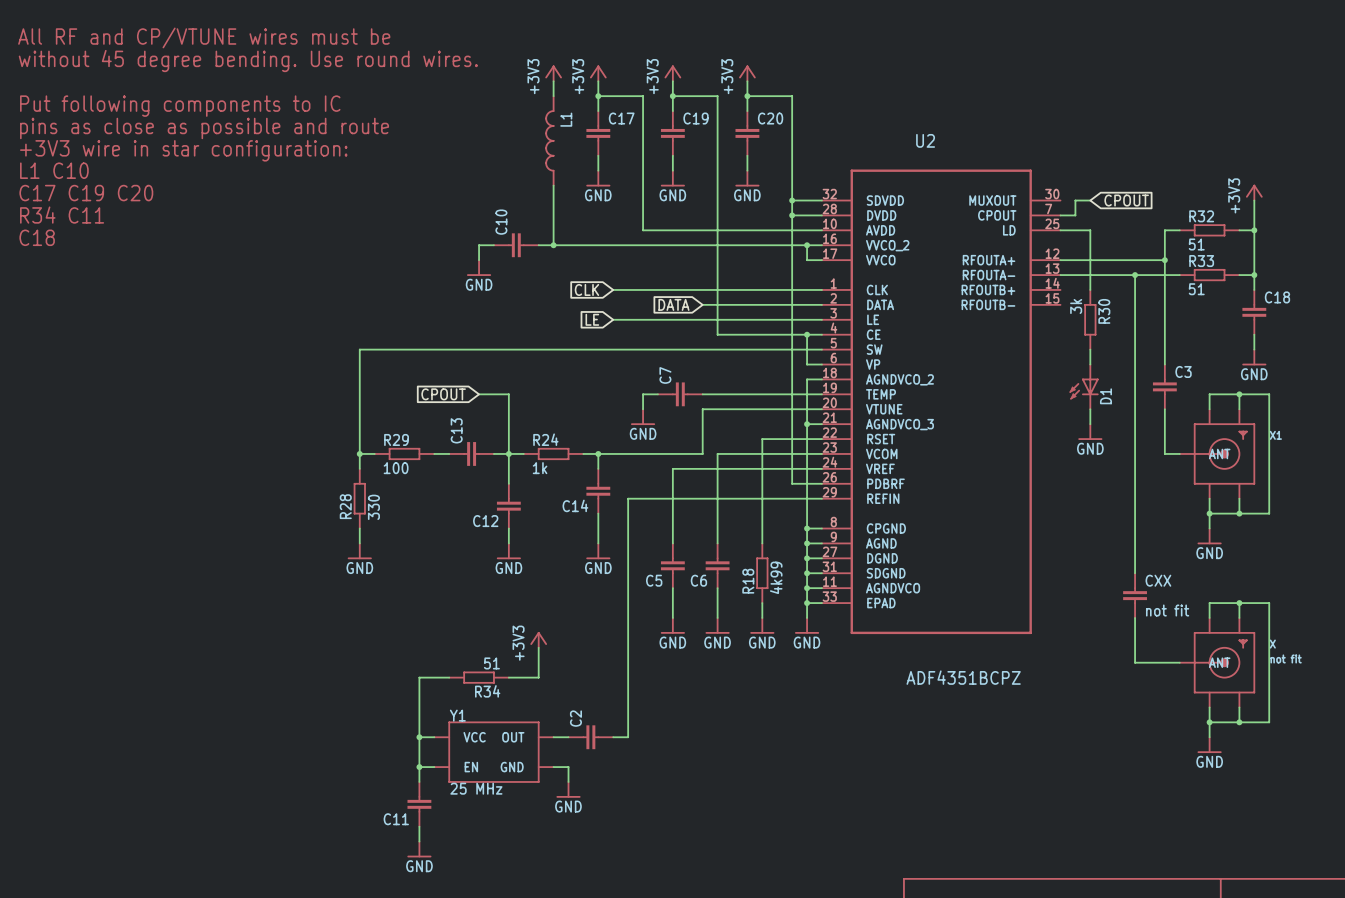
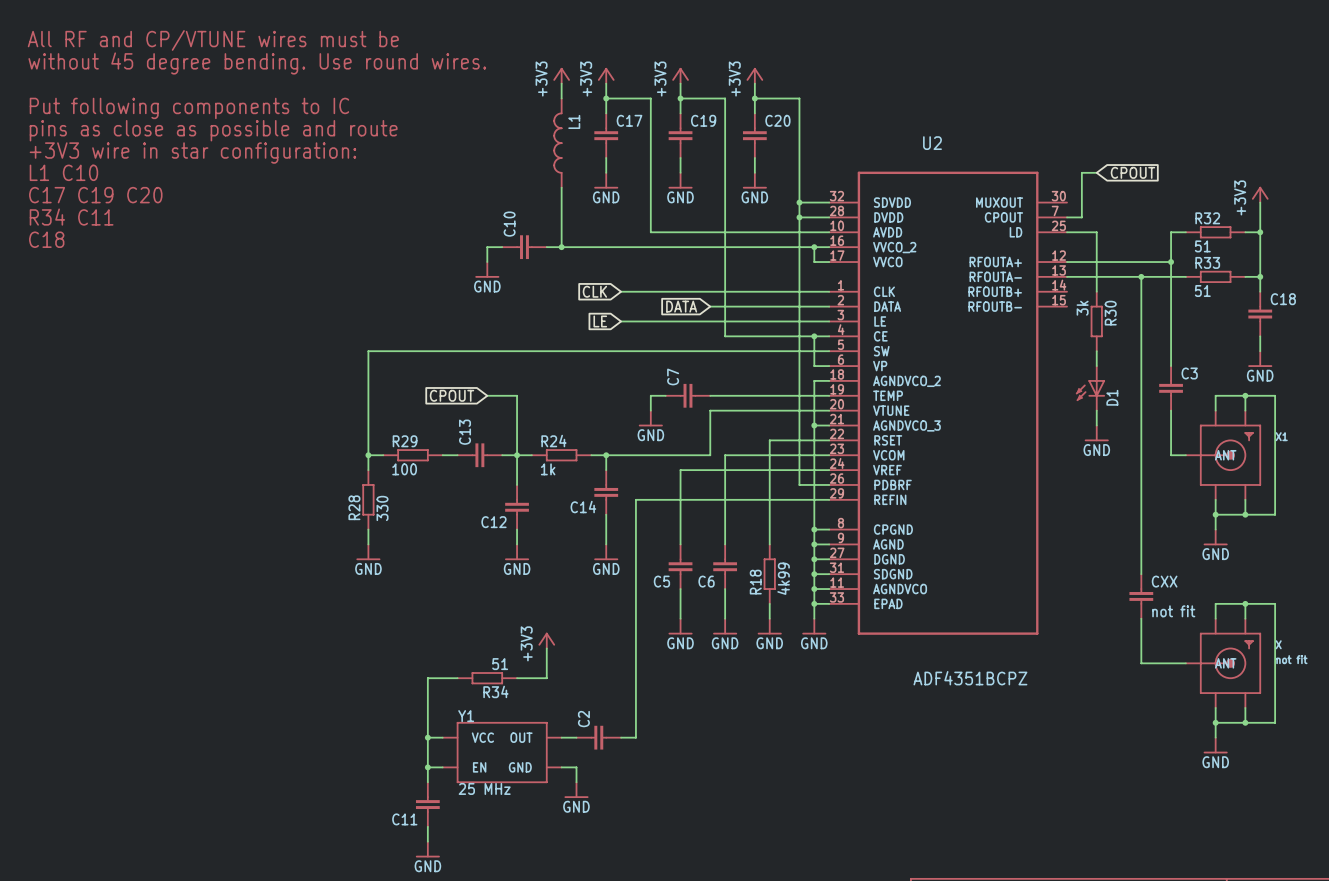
wire: (1075, 200) (1090, 200) -> (1081, 202) (1081, 172) (1096, 172)
global label position: CPOUT (1126, 200) -> CPOUT (1132, 172)

